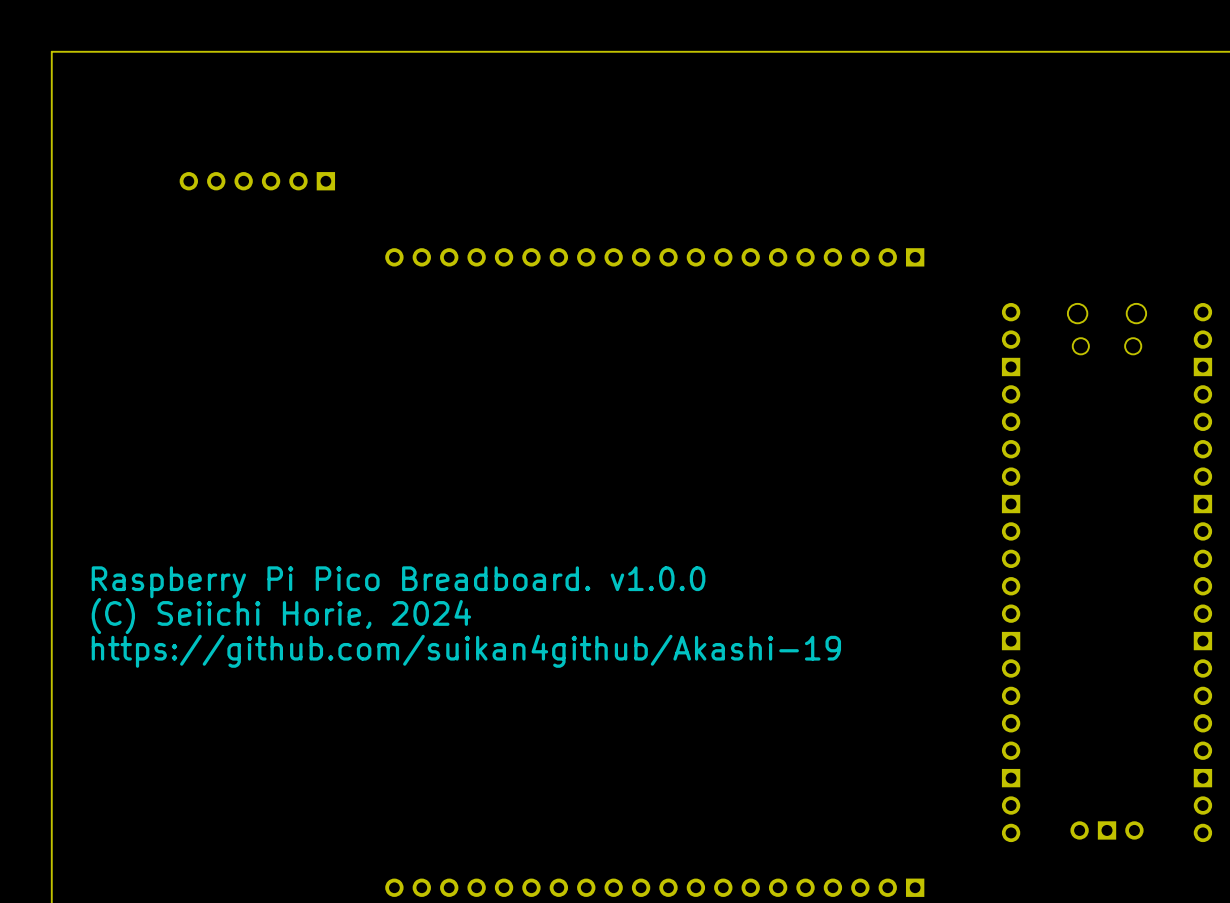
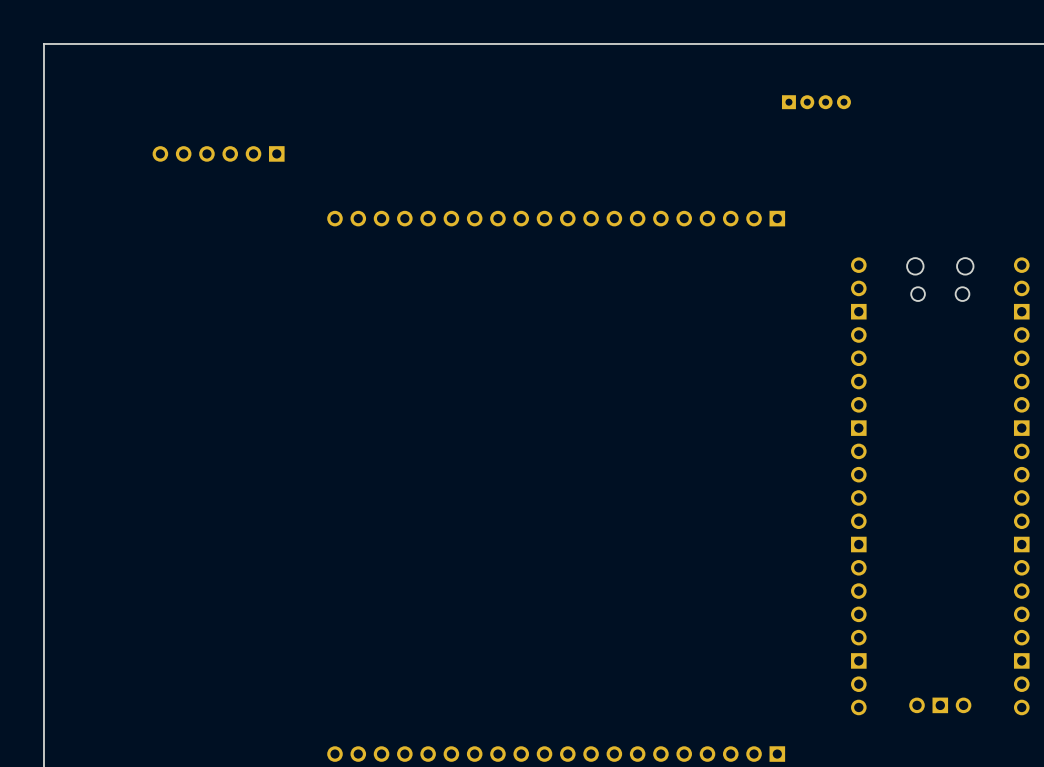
part: none -> (816, 102)
text: Raspberry Pi Pico Breadboard. v1.0.0 (398, 582) -> none
text: (C) Seiichi Horie, 2024 (281, 616) -> none
text: https://github.com/suikan4github/Akashi-19 (466, 651) -> none

